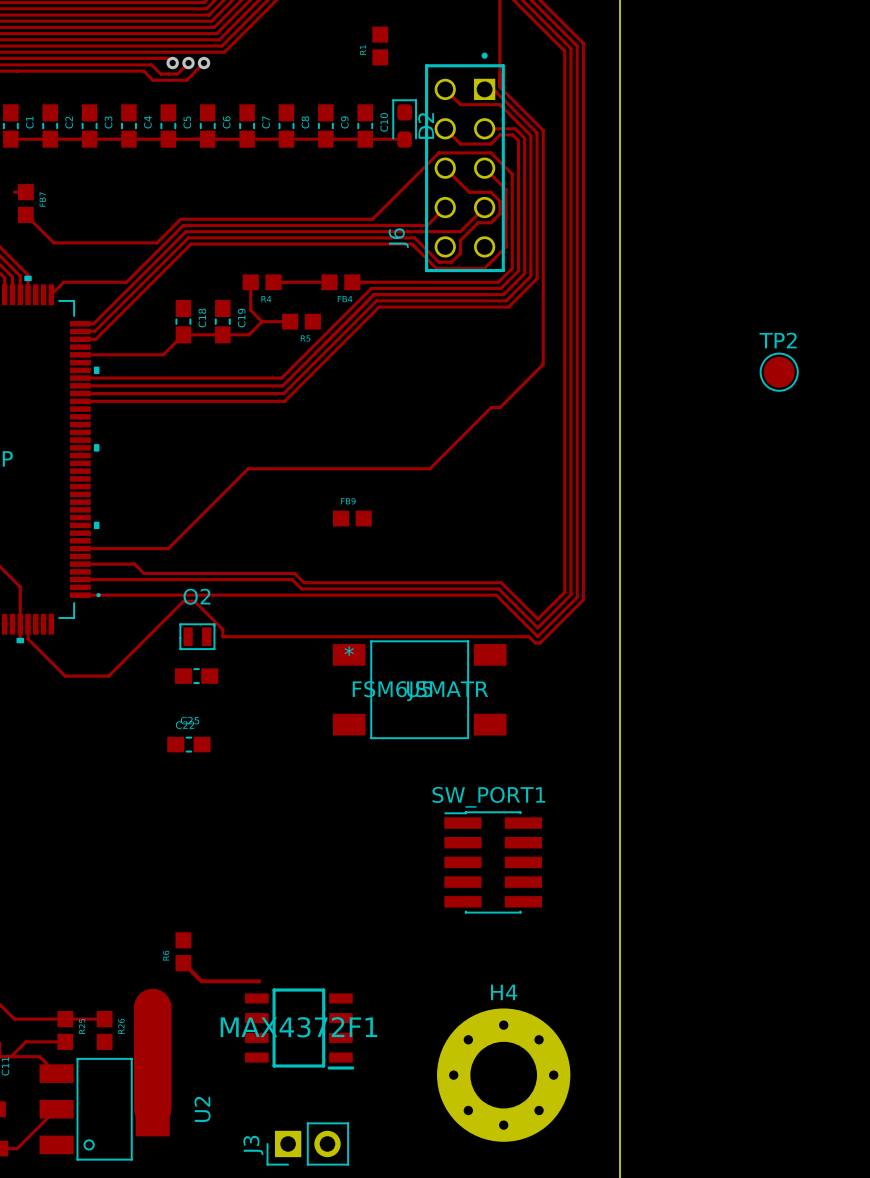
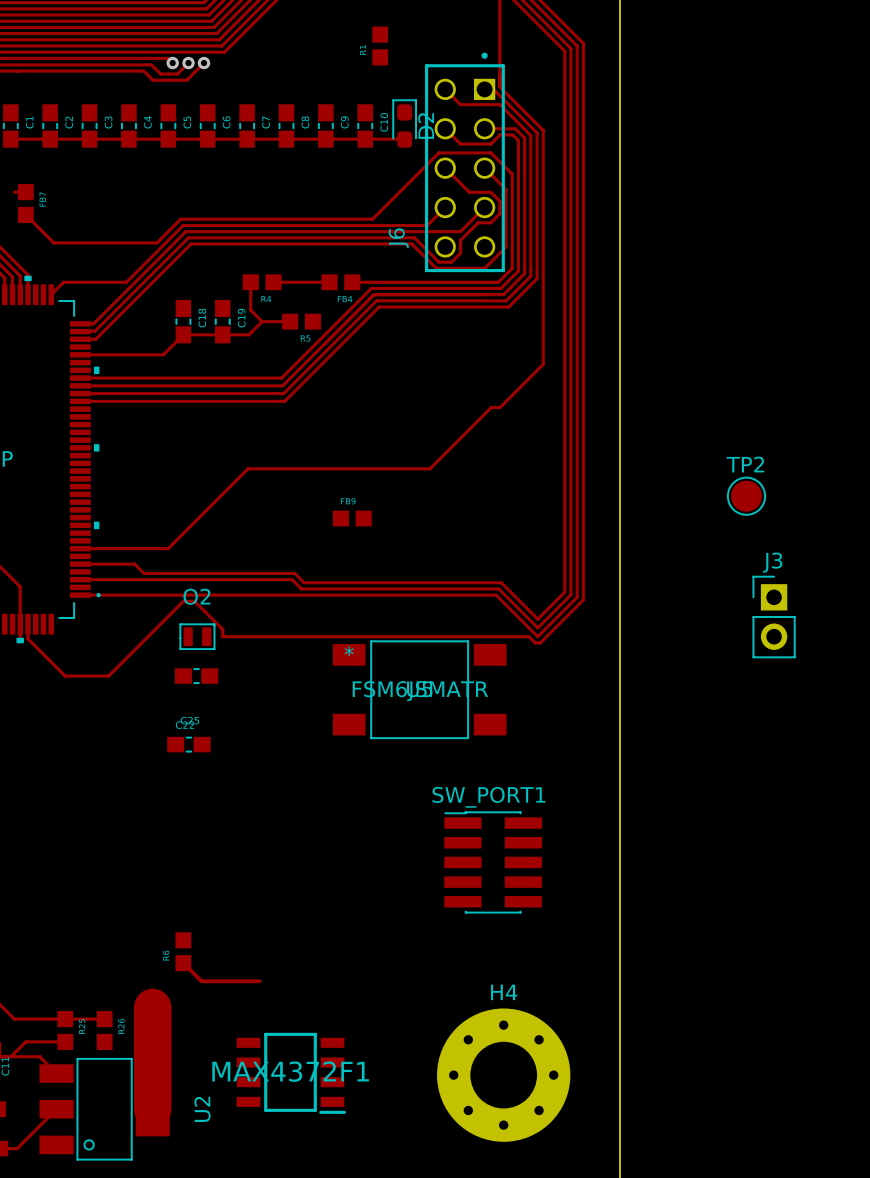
TP2 position: (779, 372) -> (746, 496)
MAX4372F1 position: (299, 1029) -> (291, 1073)
J3 rotation: 0° (307, 1143) -> 90° clockwise (774, 617)
J3 position: (307, 1143) -> (774, 617)

